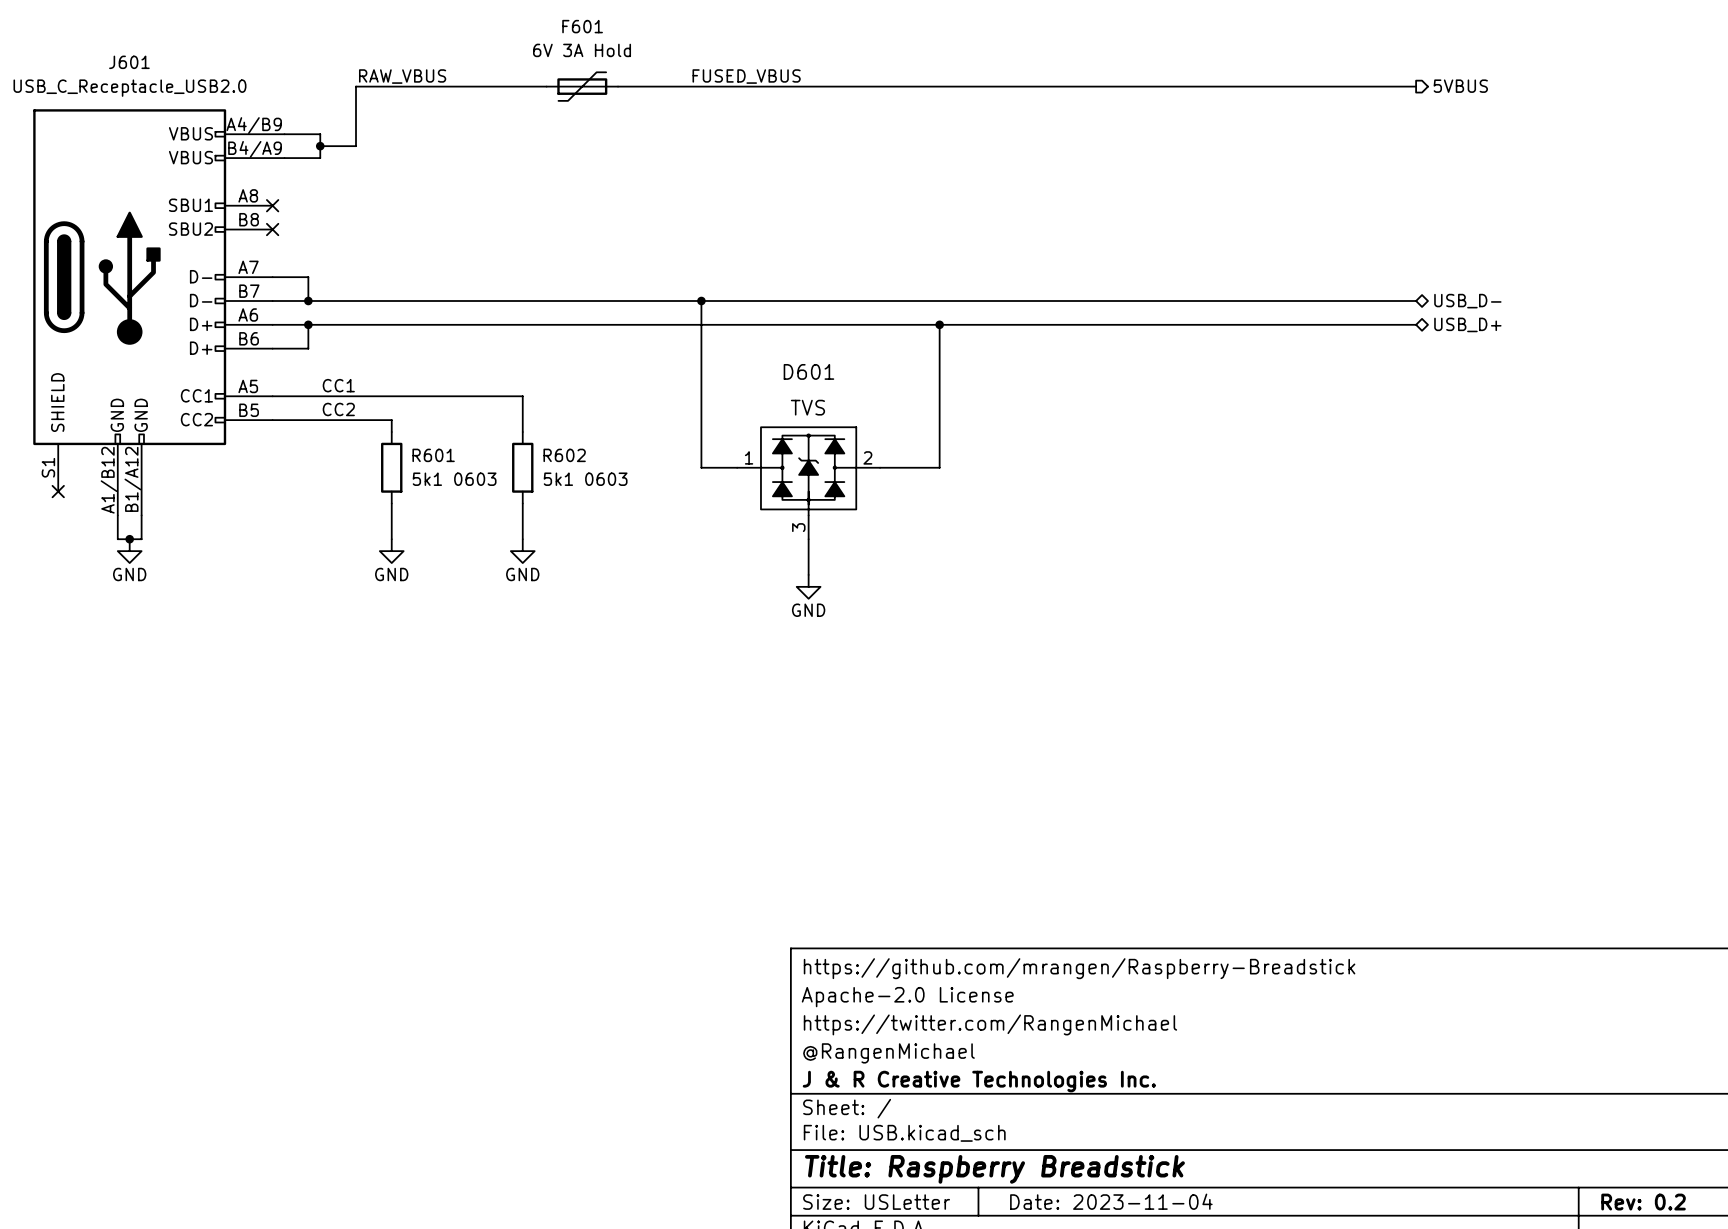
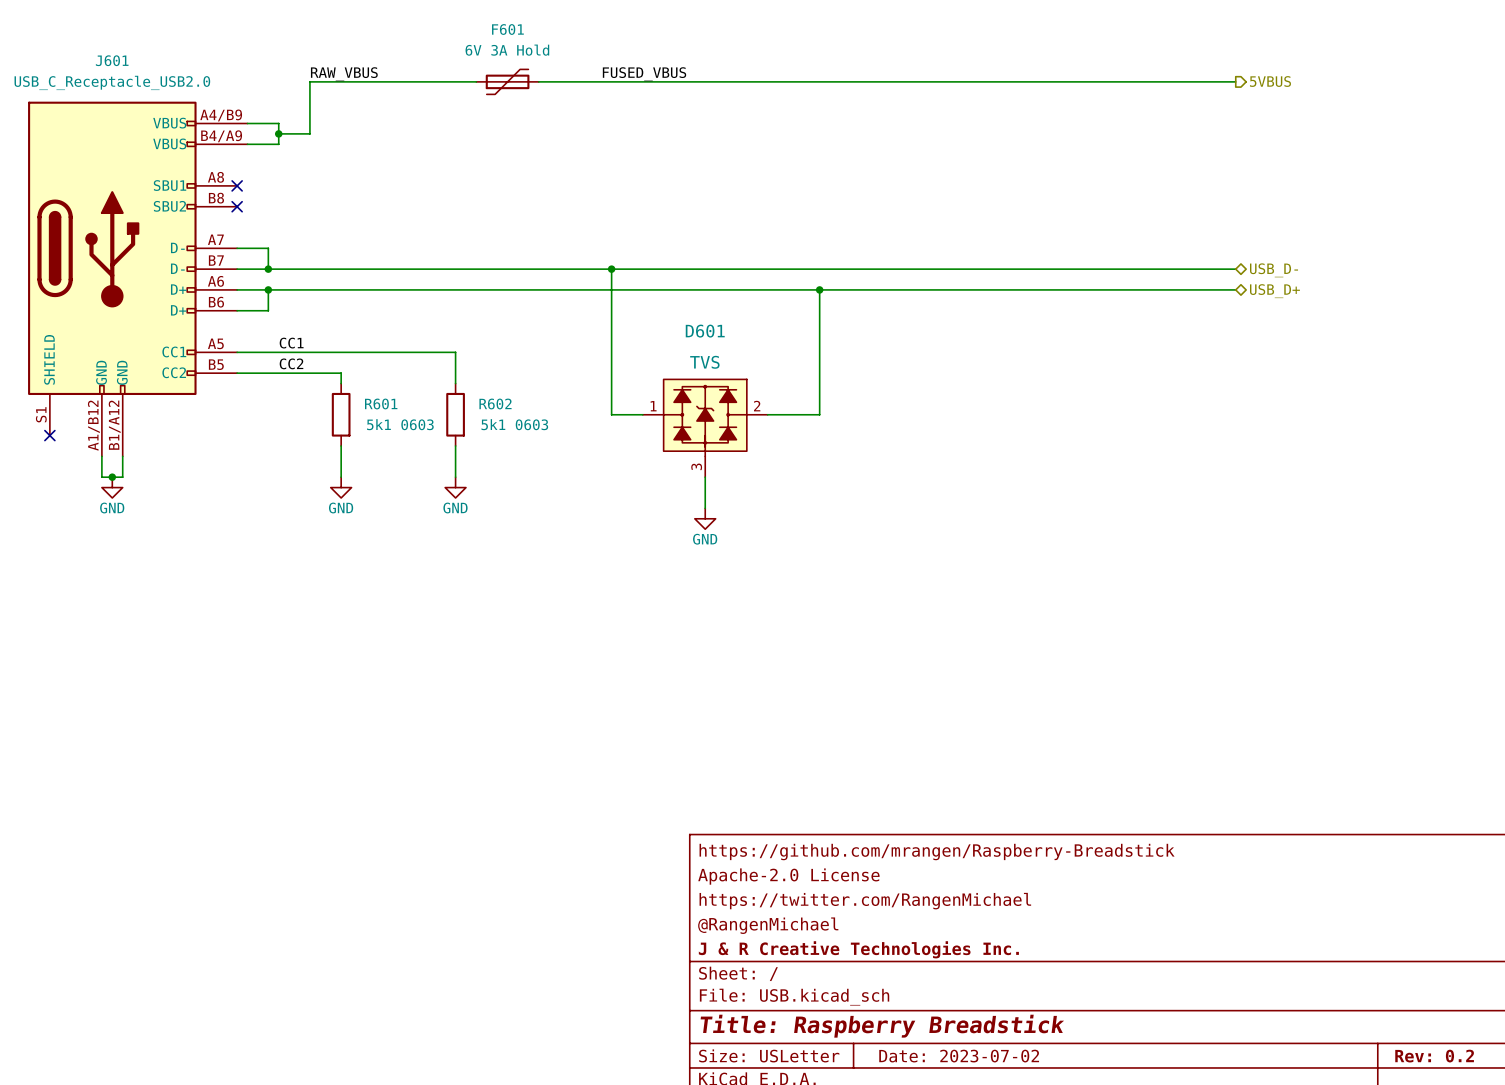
title block: Date: 2023-11-04 (1111, 1201) -> Date: 2023-07-02 (959, 1056)

